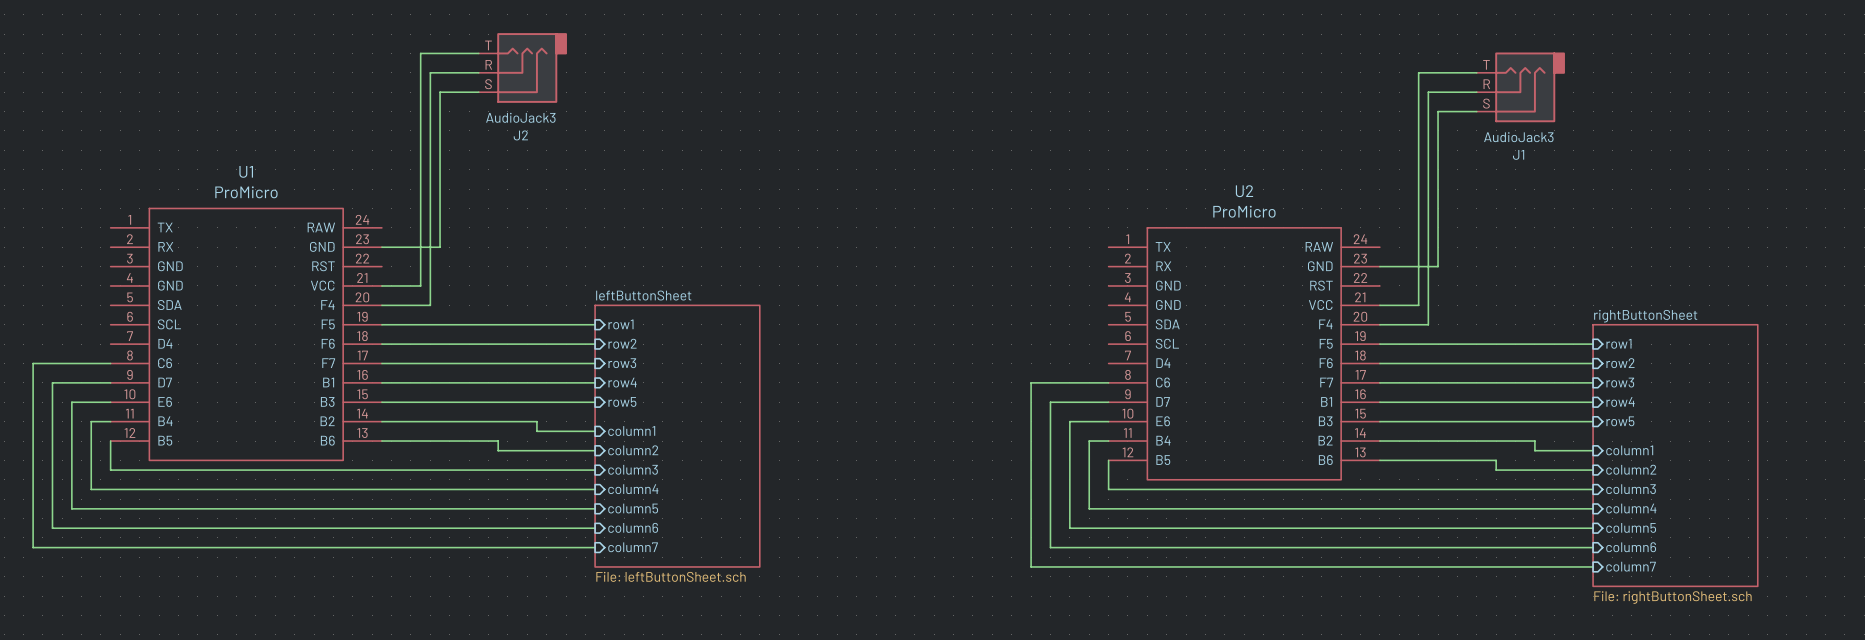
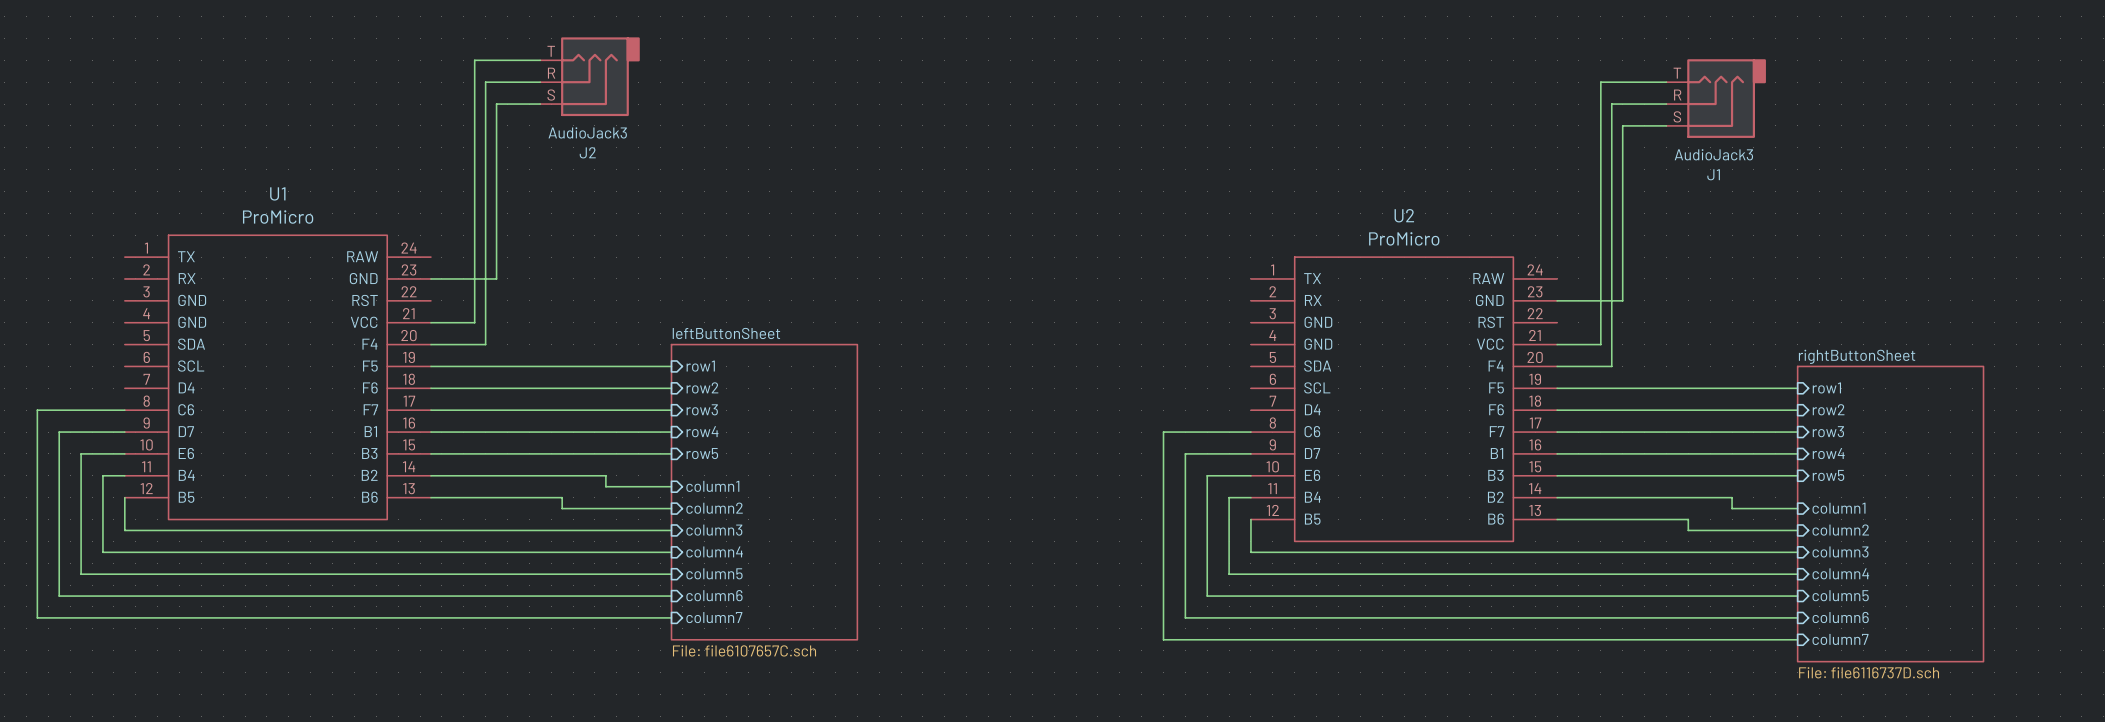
sheet leftButtonSheet value: File: leftButtonSheet.sch (671, 576) -> File: file6107657C.sch (744, 650)
sheet rightButtonSheet value: File: rightButtonSheet.sch (1672, 597) -> File: file6116737D.sch (1869, 672)

